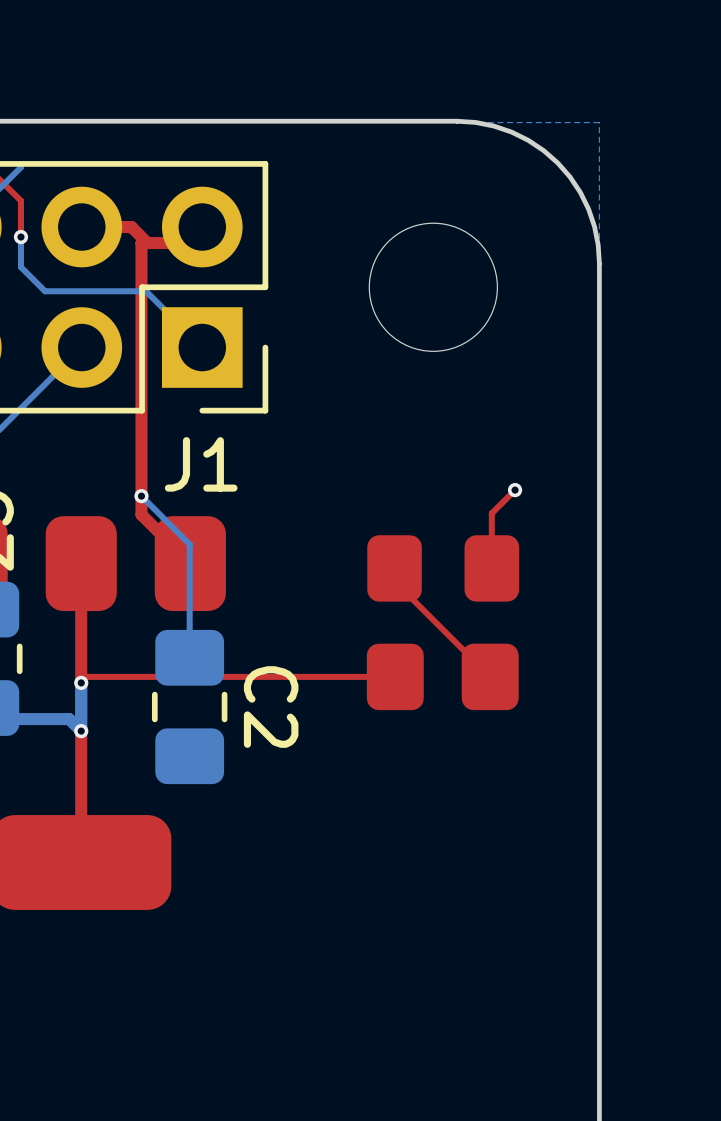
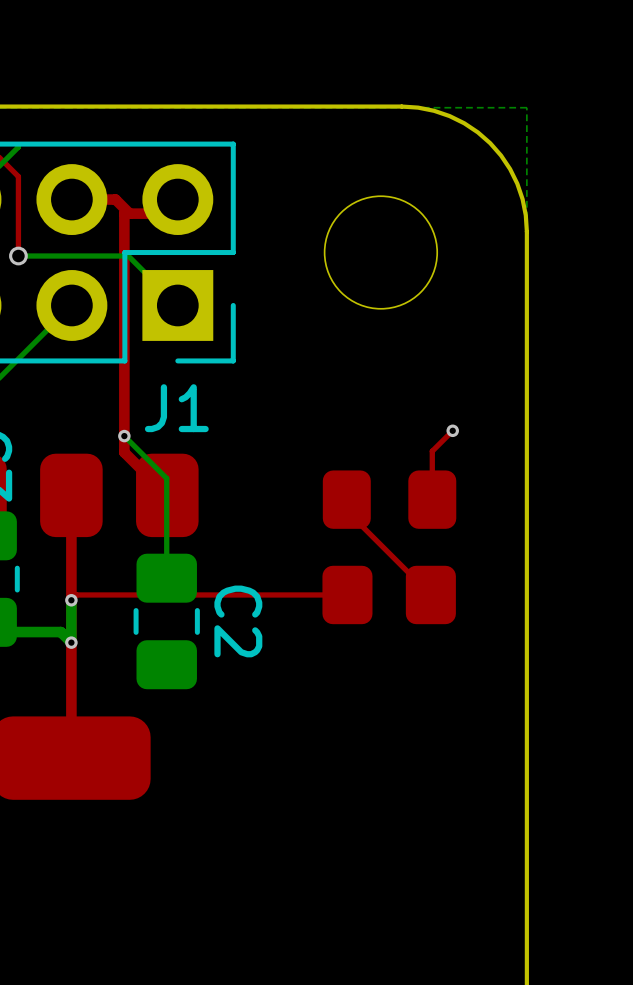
top track: none -> (18, 208) (18, 256)
bottom track: (20, 237) (20, 267) (45, 291) -> (18, 256) (39, 256)
via: (20, 237) -> none
via: none -> (18, 256)

